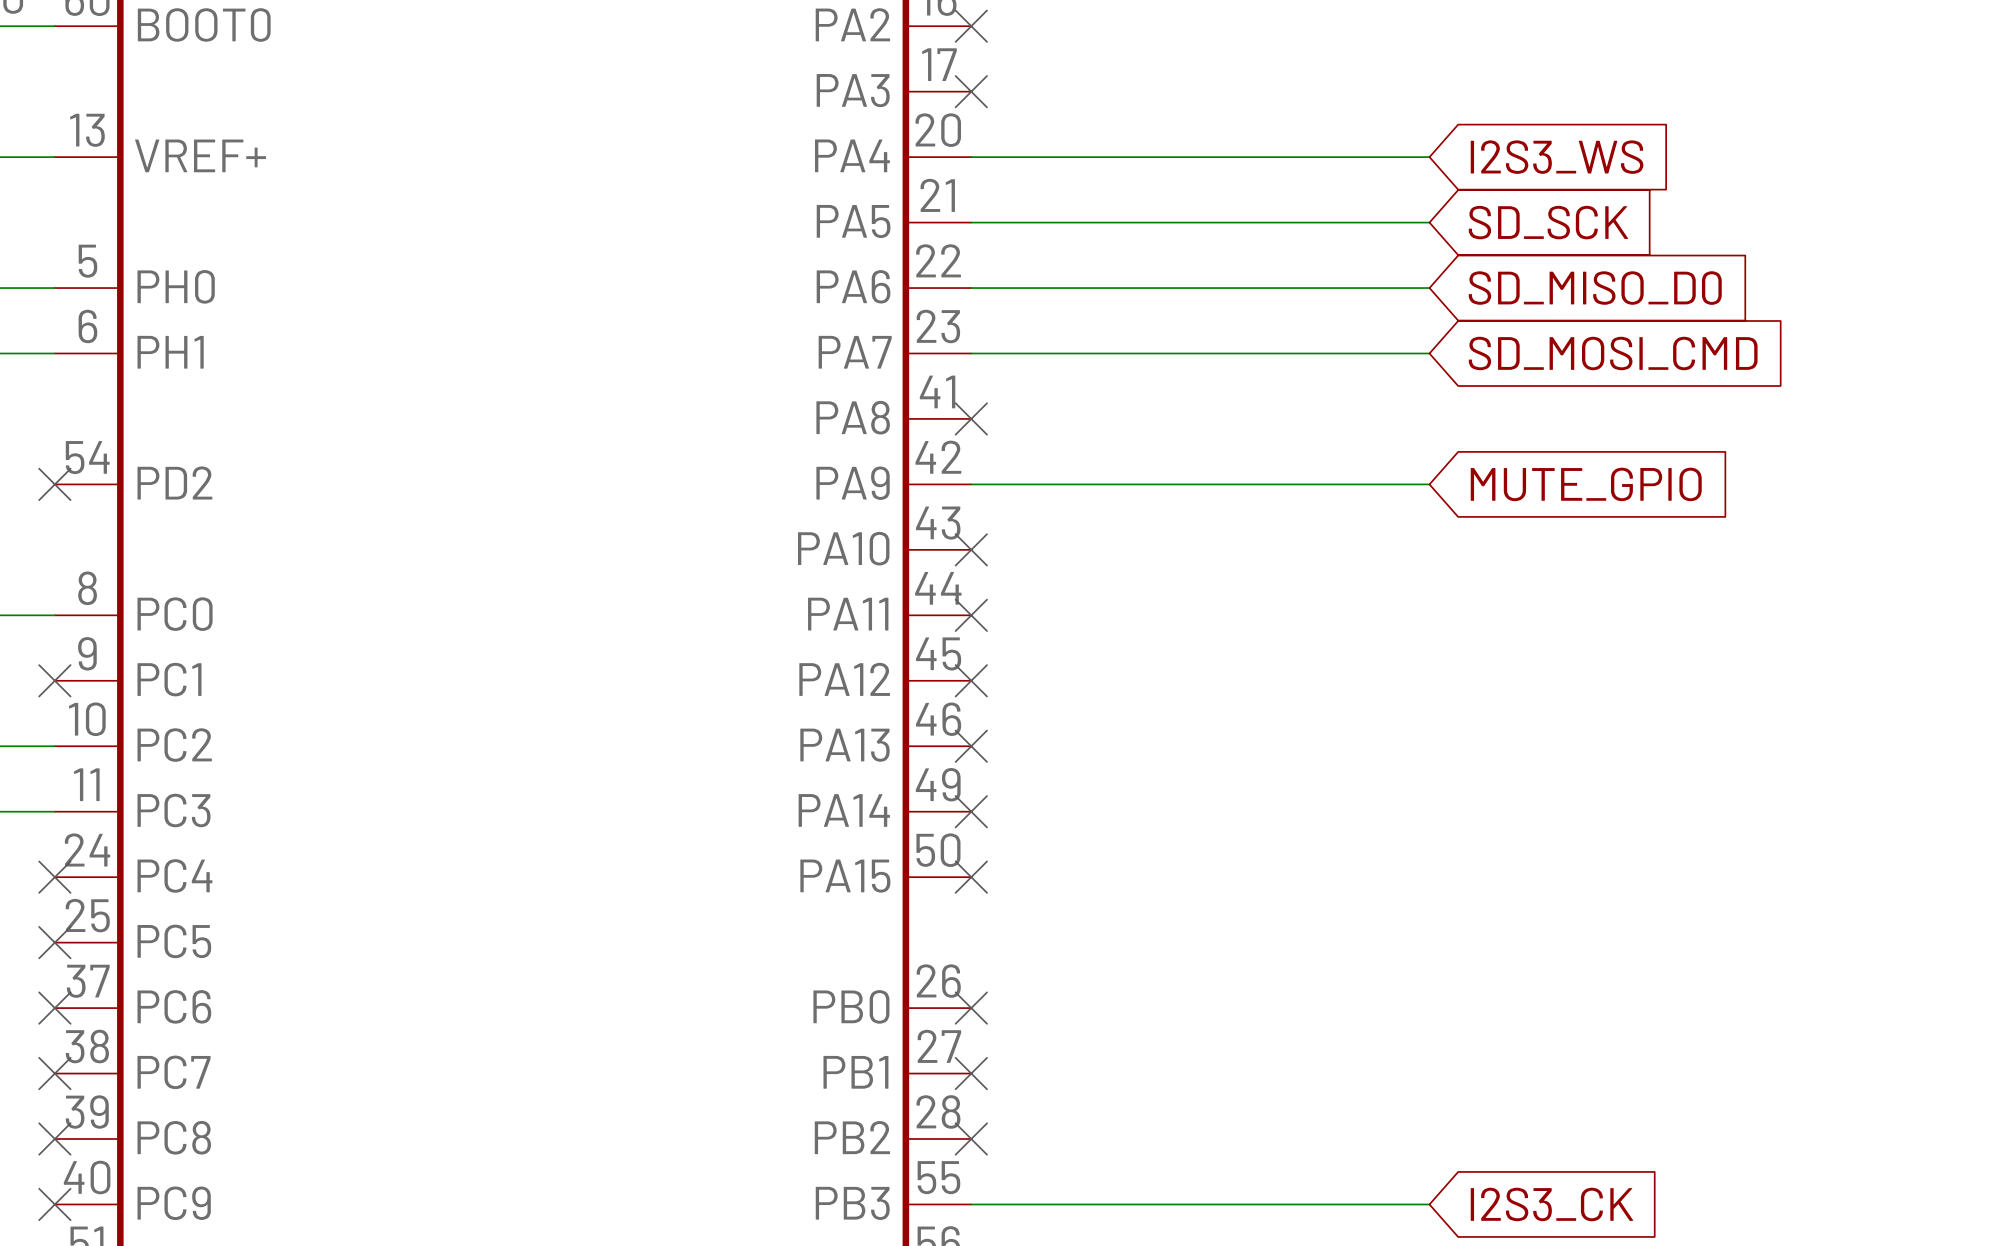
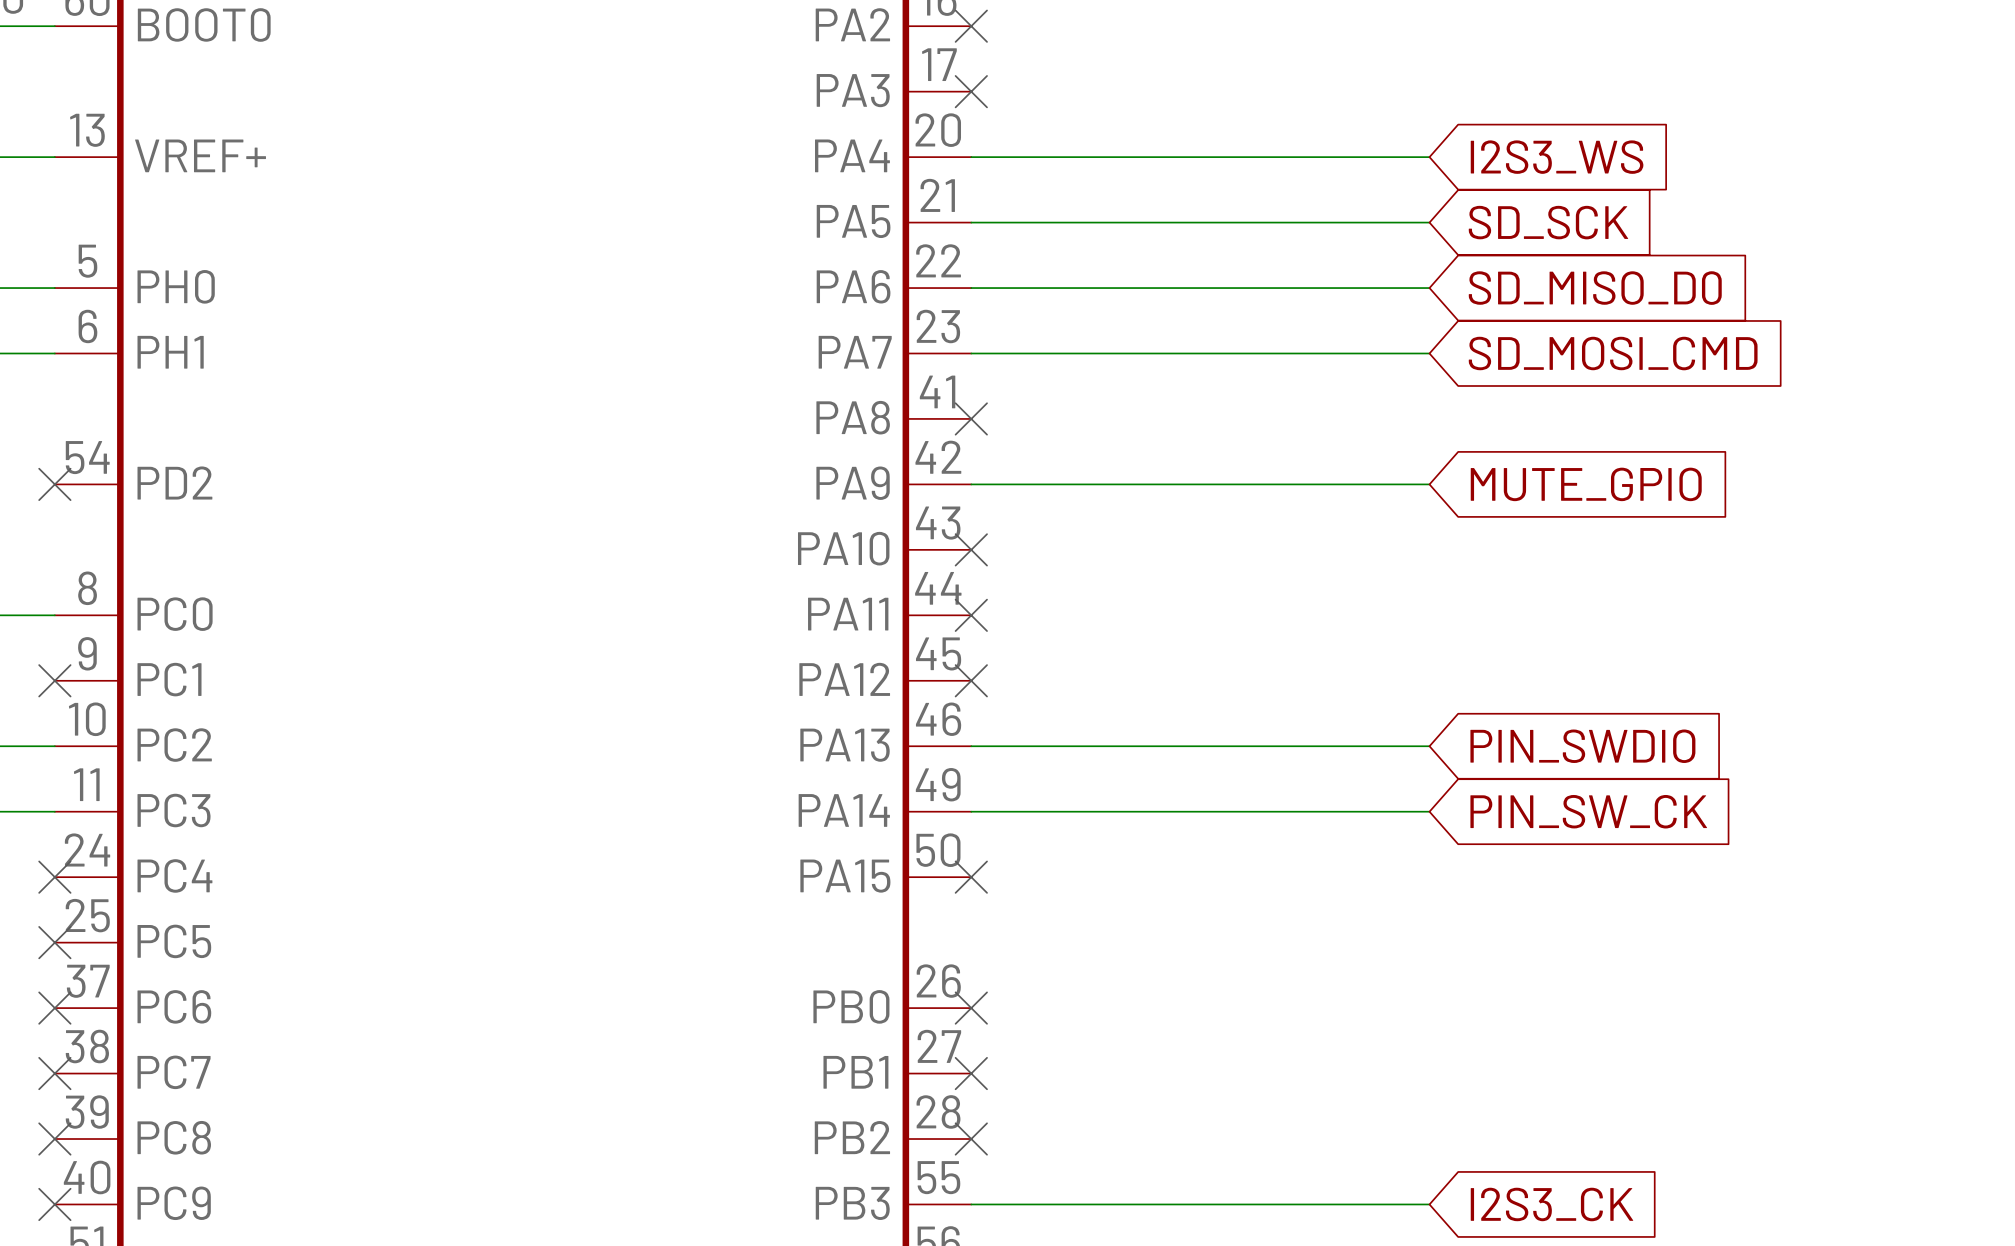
wire: none -> (971, 746) (1429, 746)
no-connect mark: (971, 746) -> none
global label: none -> PIN_SWDIO (1582, 746)
wire: none -> (971, 811) (1429, 811)
no-connect mark: (971, 811) -> none
global label: none -> PIN_SW_CK (1588, 811)

